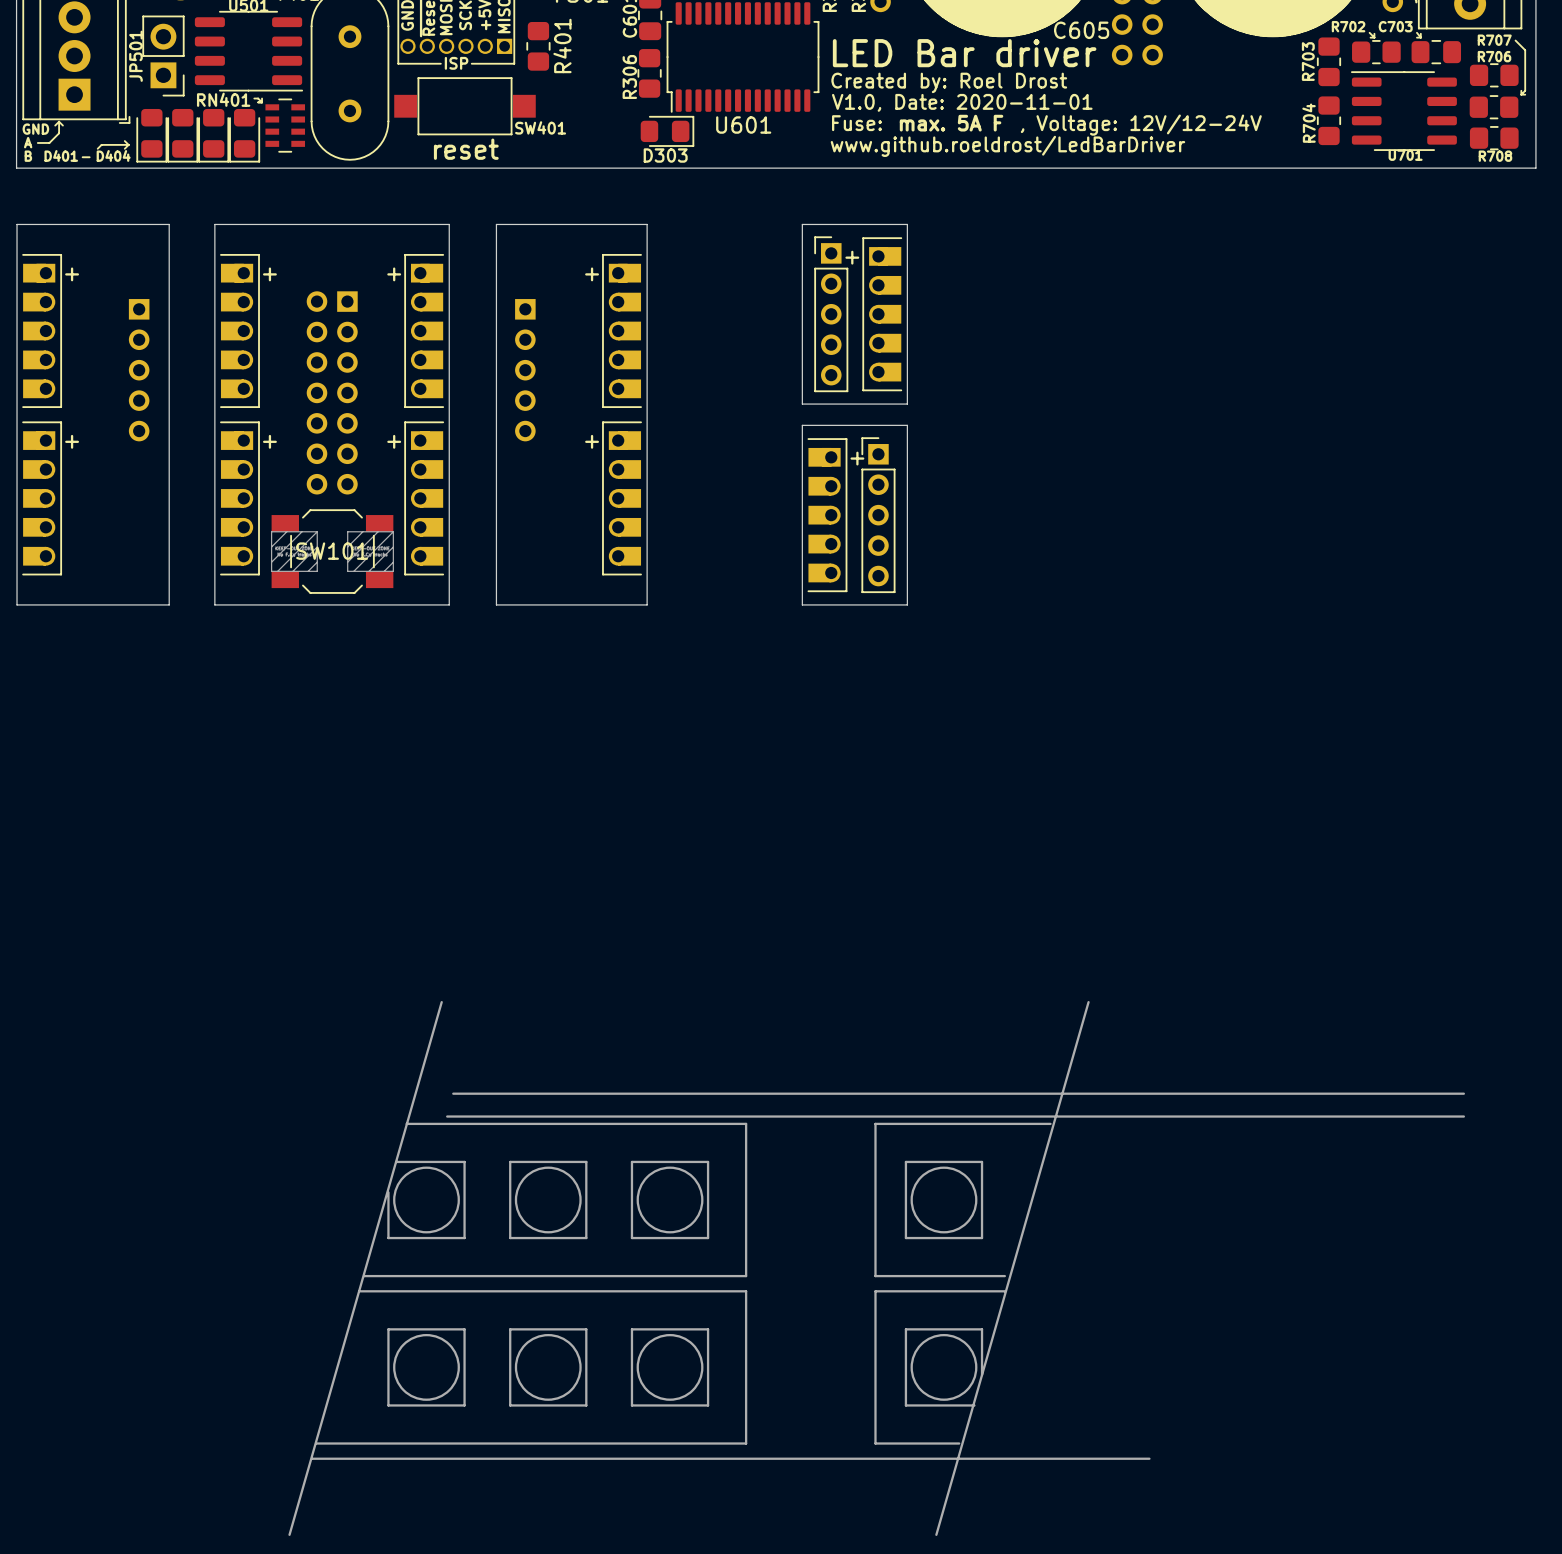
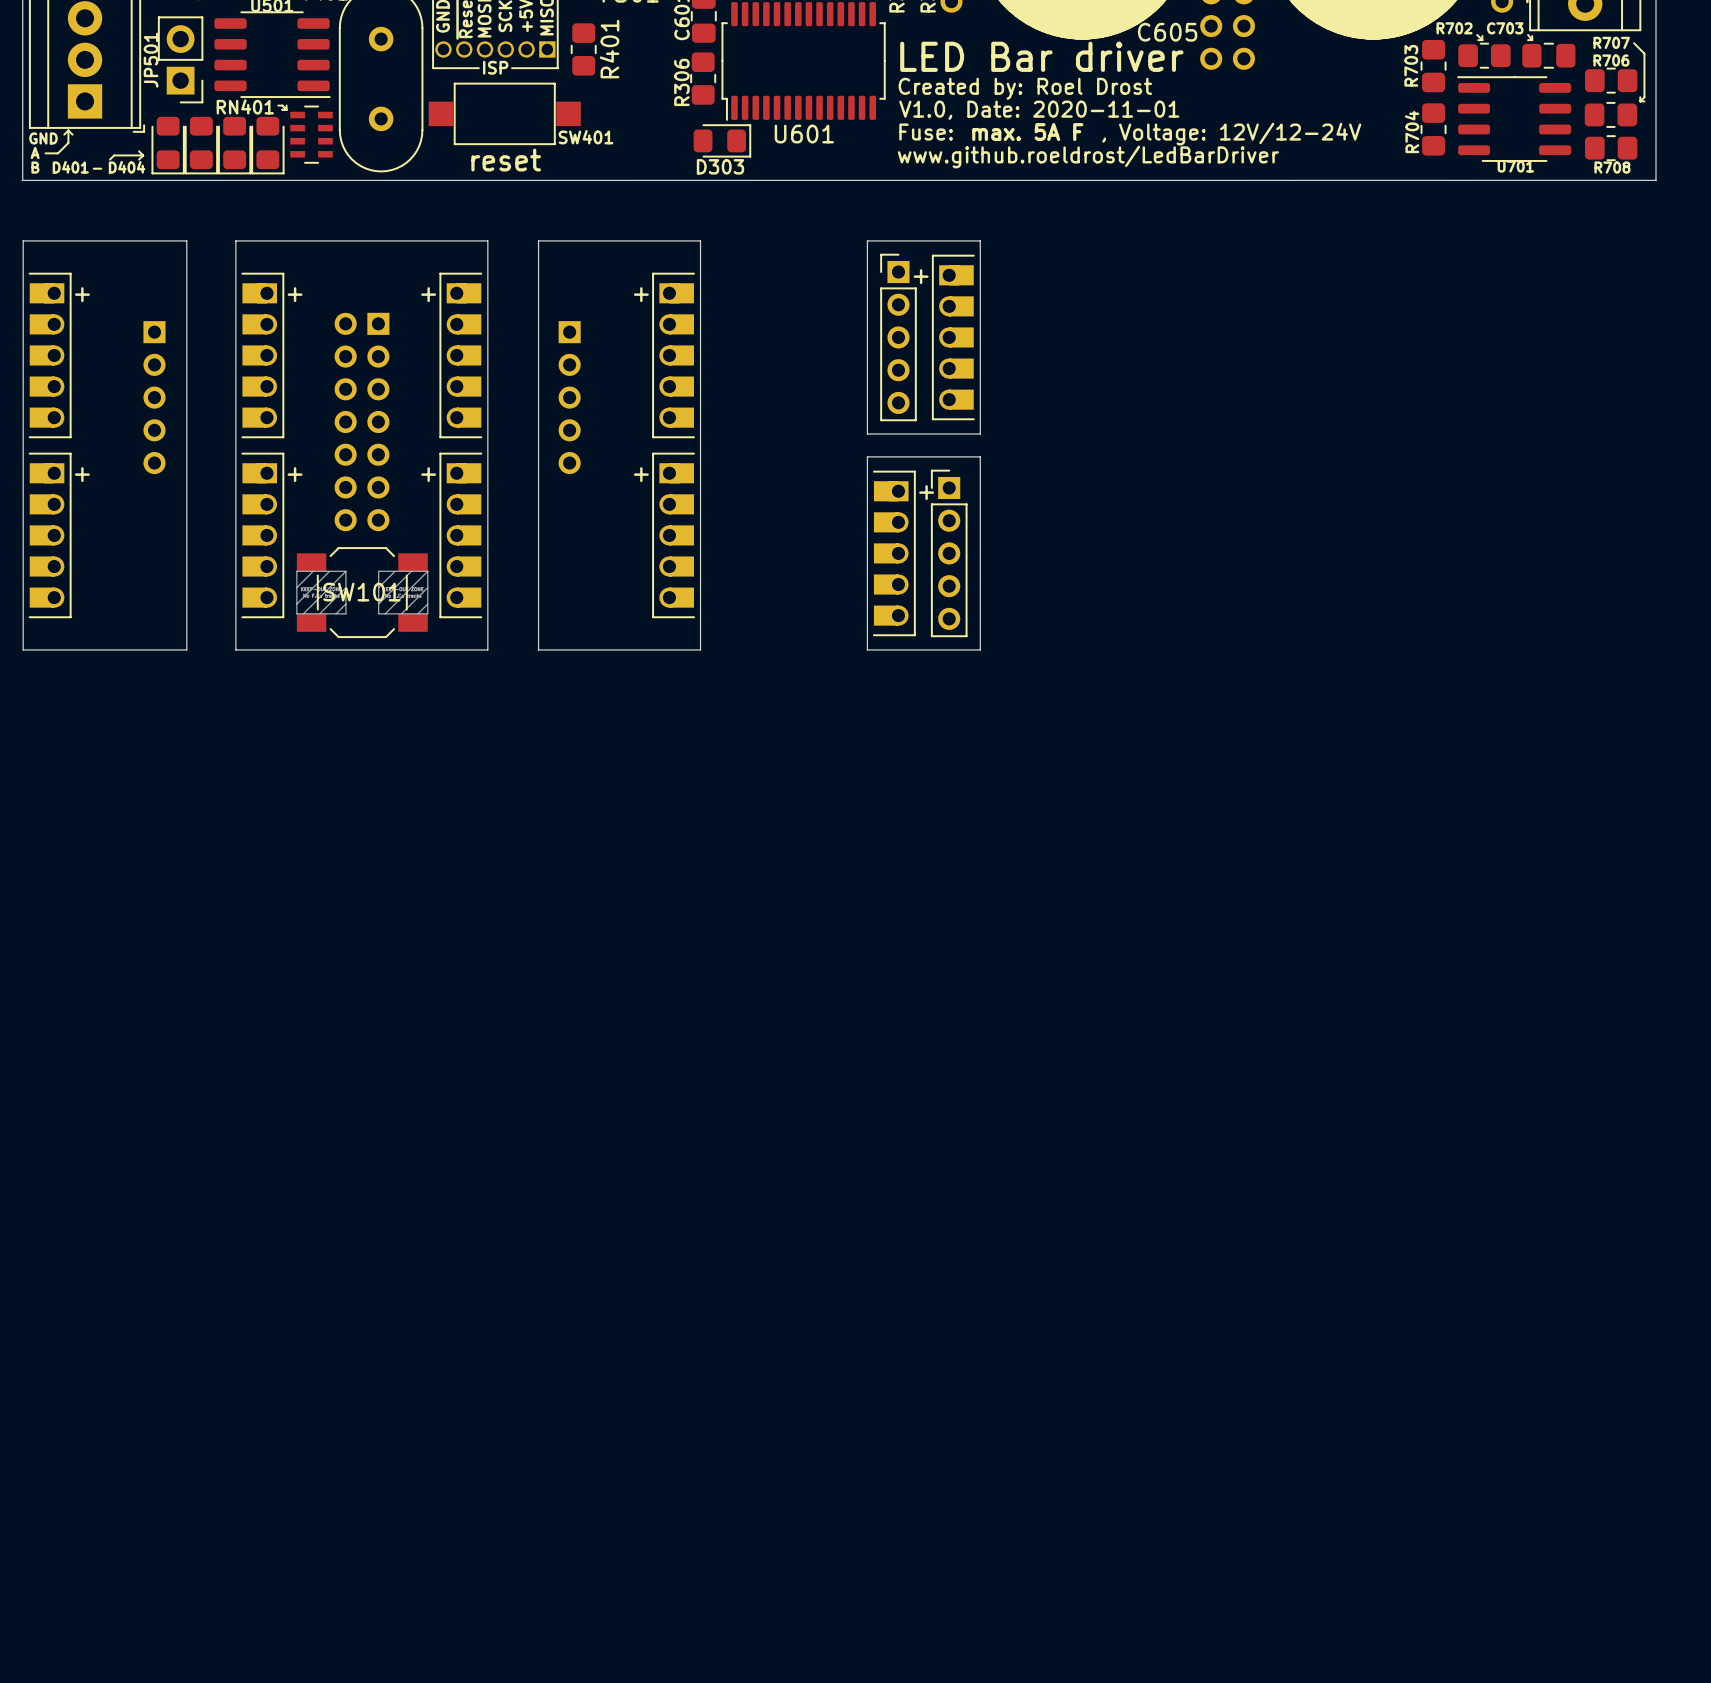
line: (441, 1002) (289, 1534) -> none
line: (1088, 1002) (936, 1534) -> none
line: (453, 1093) (1463, 1093) -> none
line: (447, 1116) (1463, 1116) -> none
line: (406, 1123) (746, 1123) (746, 1276) (364, 1276) -> none
line: (1050, 1123) (875, 1123) (875, 1276) (1004, 1276) -> none
line: (396, 1161) (464, 1161) (464, 1238) (388, 1238) (388, 1192) -> none
line: (510, 1161) (586, 1161) (586, 1238) (510, 1238) (510, 1161) -> none
line: (631, 1161) (708, 1161) (708, 1238) (631, 1238) (631, 1161) -> none
line: (905, 1161) (982, 1161) (982, 1238) (905, 1238) (905, 1161) -> none
drawing: [393, 1166, 460, 1234] -> none
drawing: [514, 1166, 582, 1234] -> none
drawing: [636, 1166, 704, 1234] -> none
drawing: [910, 1166, 978, 1234] -> none
line: (359, 1291) (746, 1291) (746, 1443) (316, 1443) -> none
line: (1004, 1291) (875, 1291) (875, 1443) (959, 1443) -> none
line: (388, 1329) (464, 1329) (464, 1405) (388, 1405) (388, 1329) -> none
line: (510, 1329) (586, 1329) (586, 1405) (510, 1405) (510, 1329) -> none
line: (631, 1329) (708, 1329) (708, 1405) (631, 1405) (631, 1329) -> none
drawing: [393, 1333, 460, 1401] -> none
drawing: [514, 1333, 582, 1401] -> none
drawing: [636, 1333, 704, 1401] -> none
drawing: [910, 1333, 978, 1401] -> none
line: (982, 1375) (982, 1329) (905, 1329) (905, 1405) (974, 1405) -> none
line: (312, 1458) (1149, 1458) -> none

